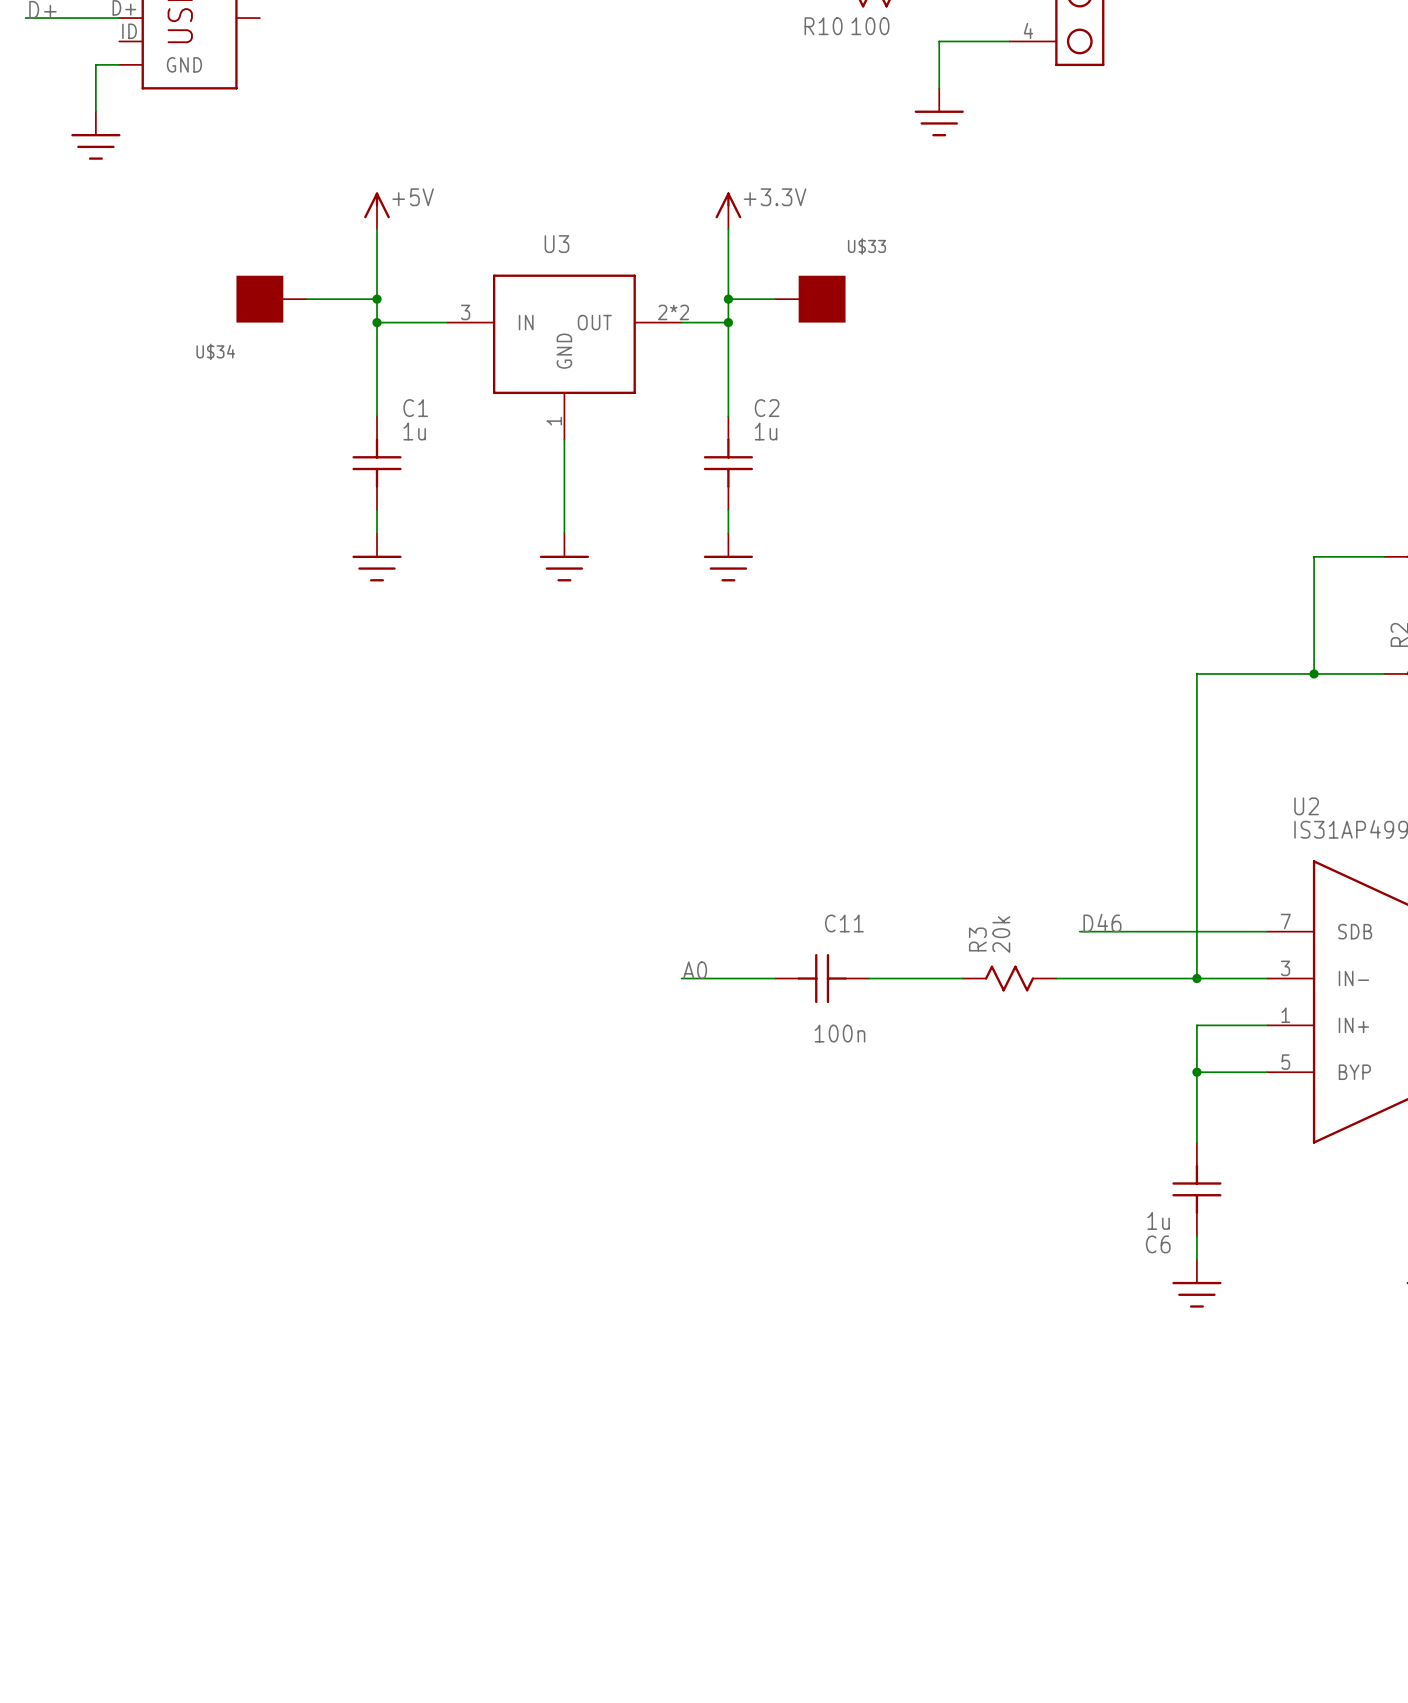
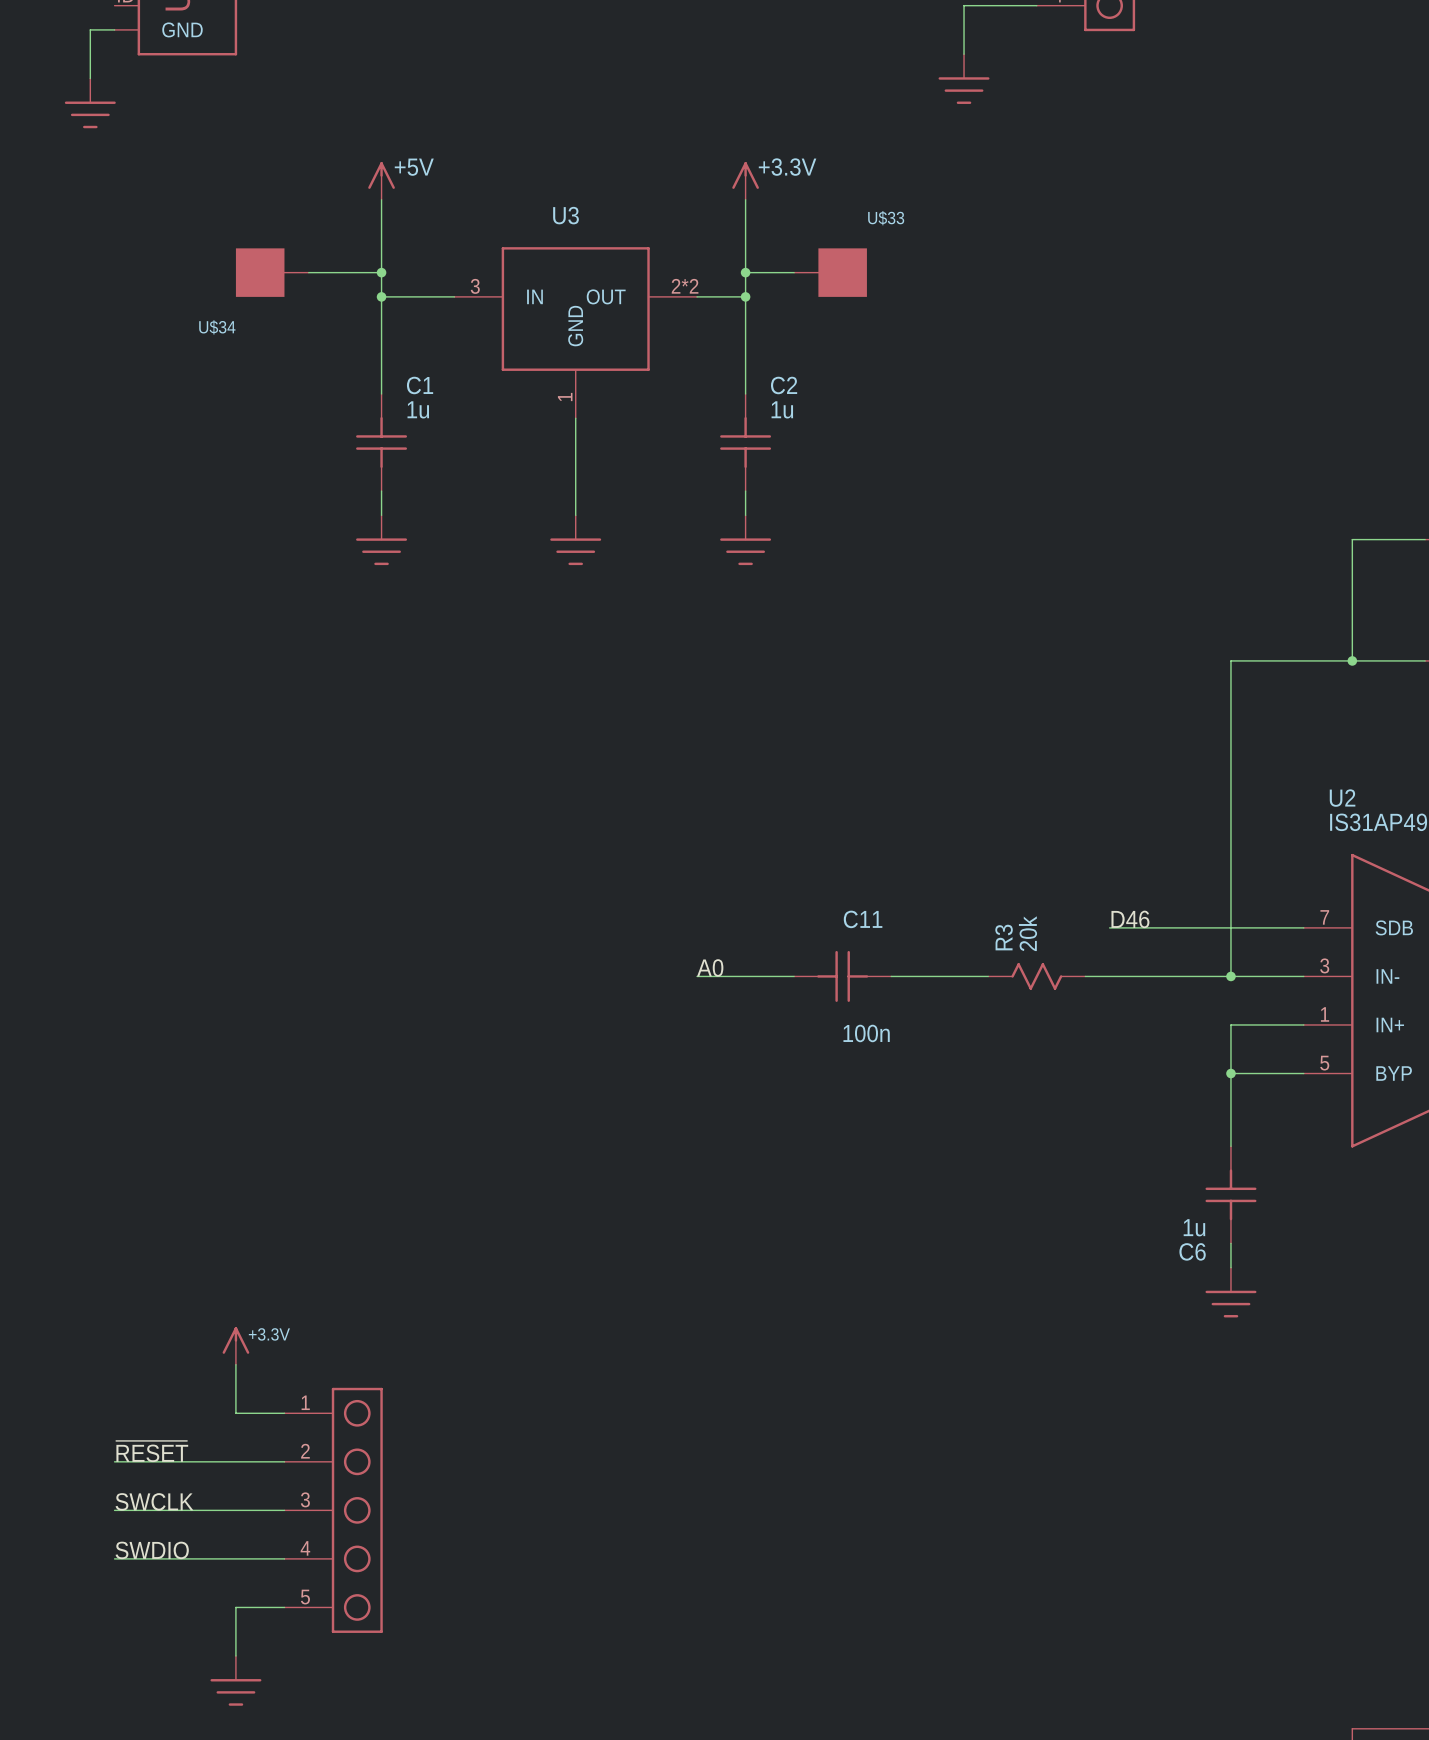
power symbol: none -> +3.3V (235, 1345)
wire: none -> (235, 1364) (235, 1413) (284, 1413)
label: none -> ~{RESET} (152, 1451)
wire: none -> (114, 1461) (284, 1461)
label: none -> SWCLK (154, 1501)
wire: none -> (114, 1510) (284, 1510)
part: none -> (333, 1510)
label: none -> SWDIO (152, 1550)
wire: none -> (114, 1558) (284, 1558)
wire: none -> (284, 1607) (235, 1607) (235, 1655)
power symbol: none -> (235, 1680)

